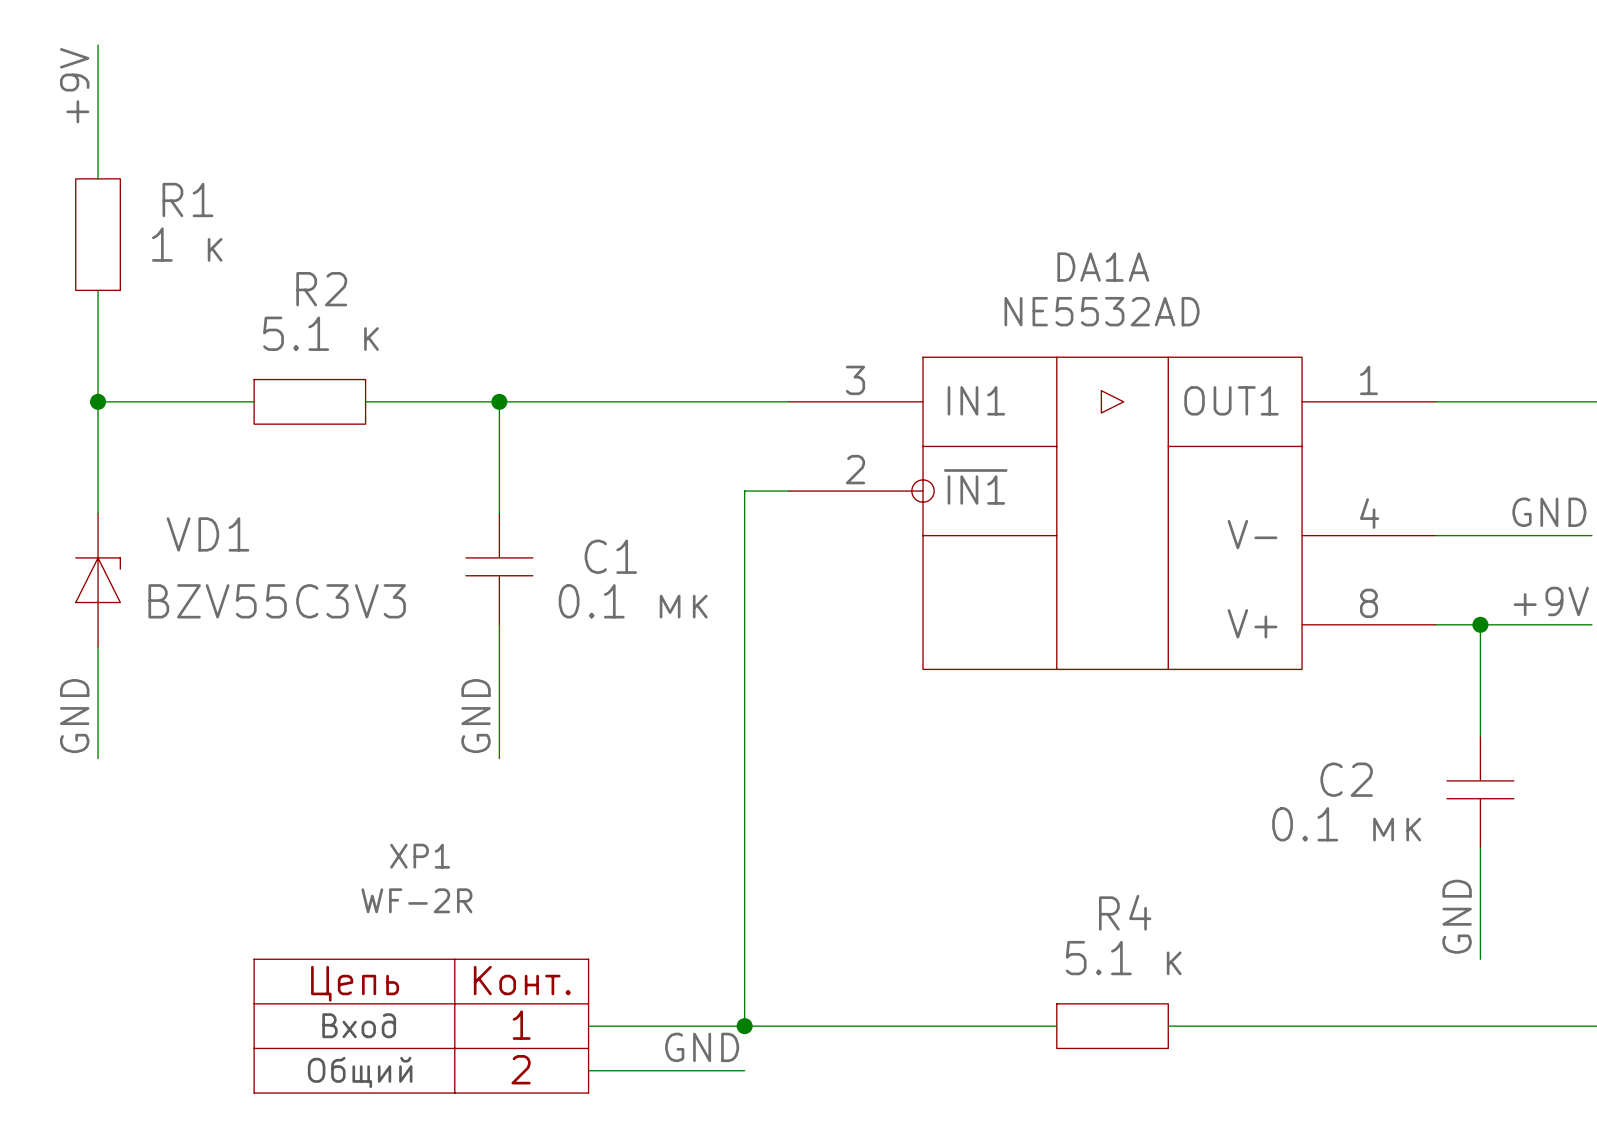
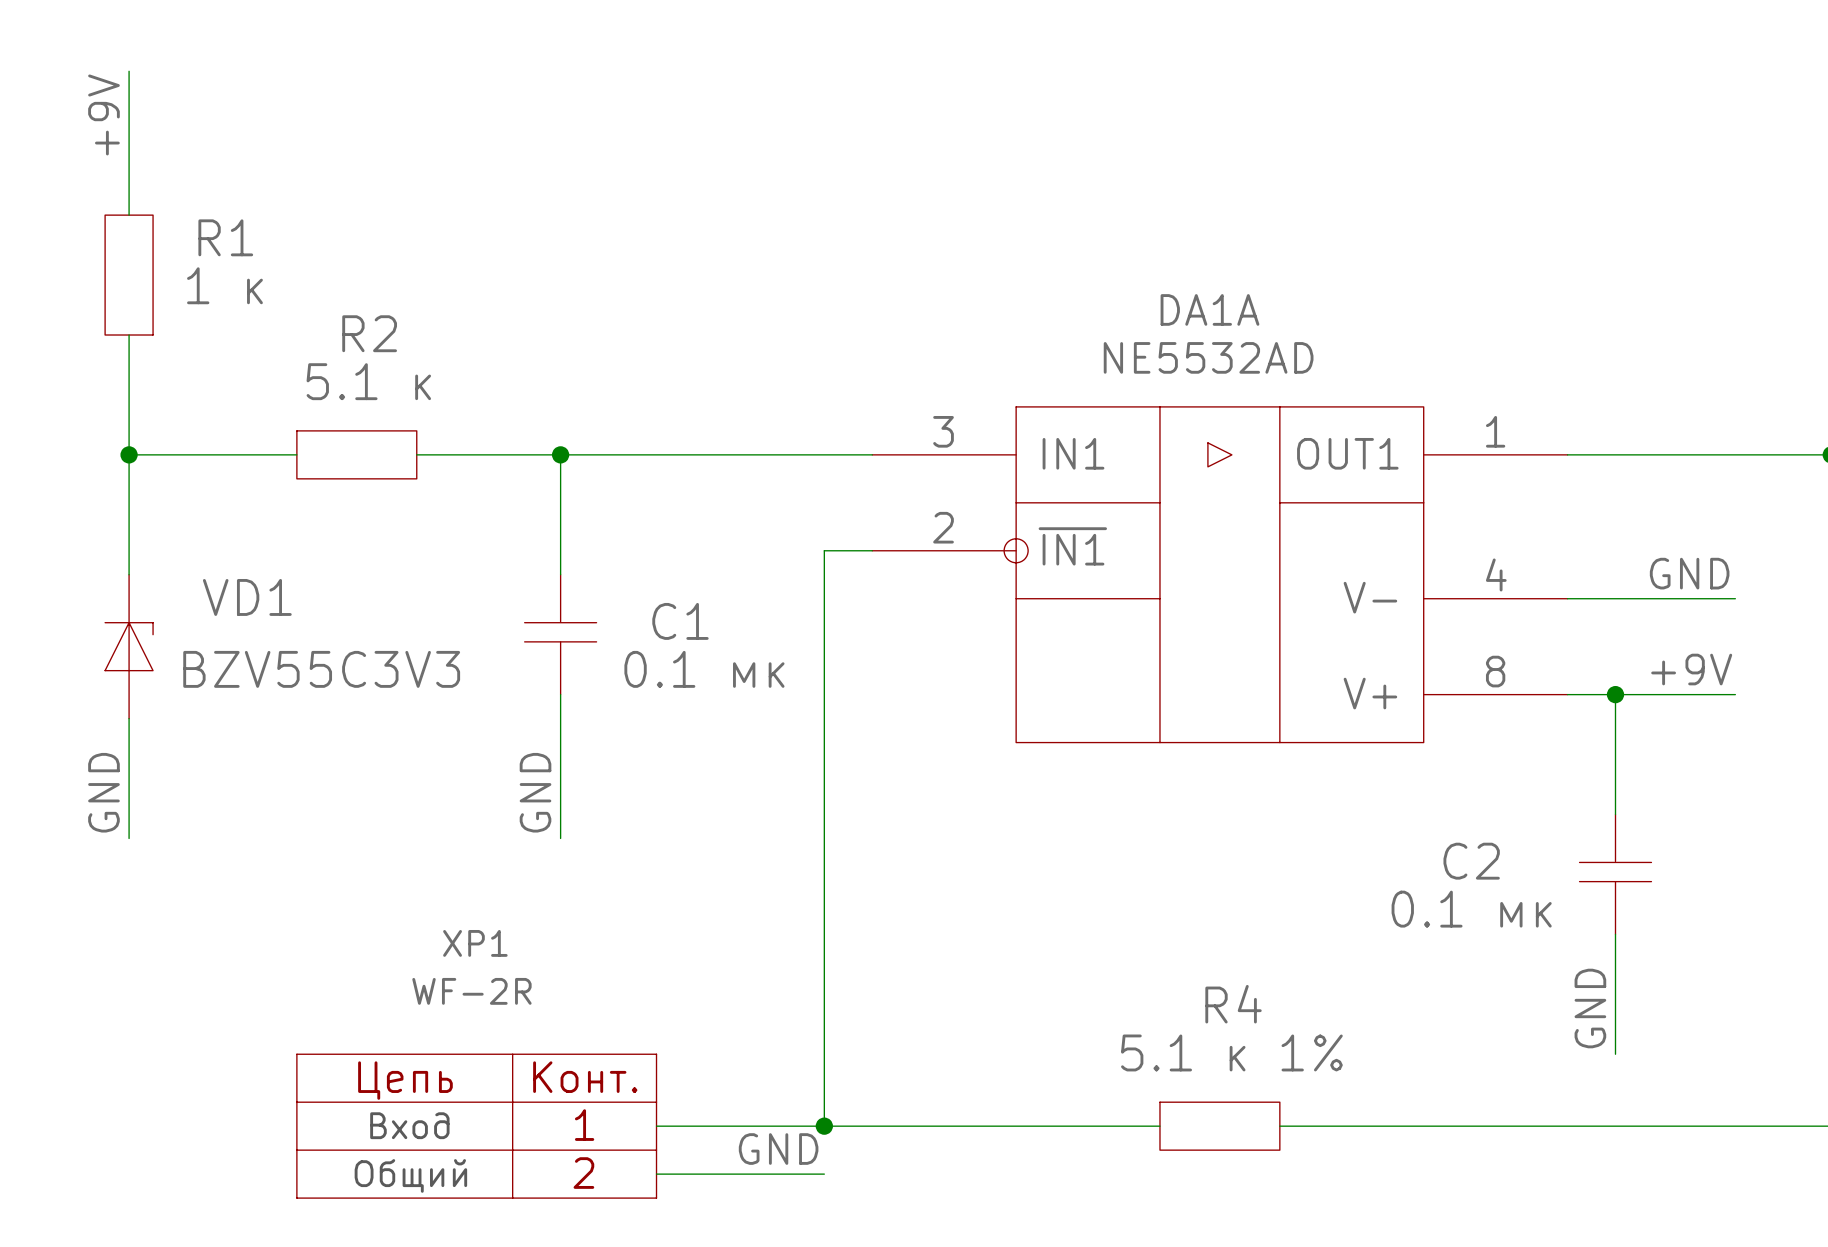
R4 value: 5.1 к (1123, 958) -> 5.1 к 1% (1231, 1052)

